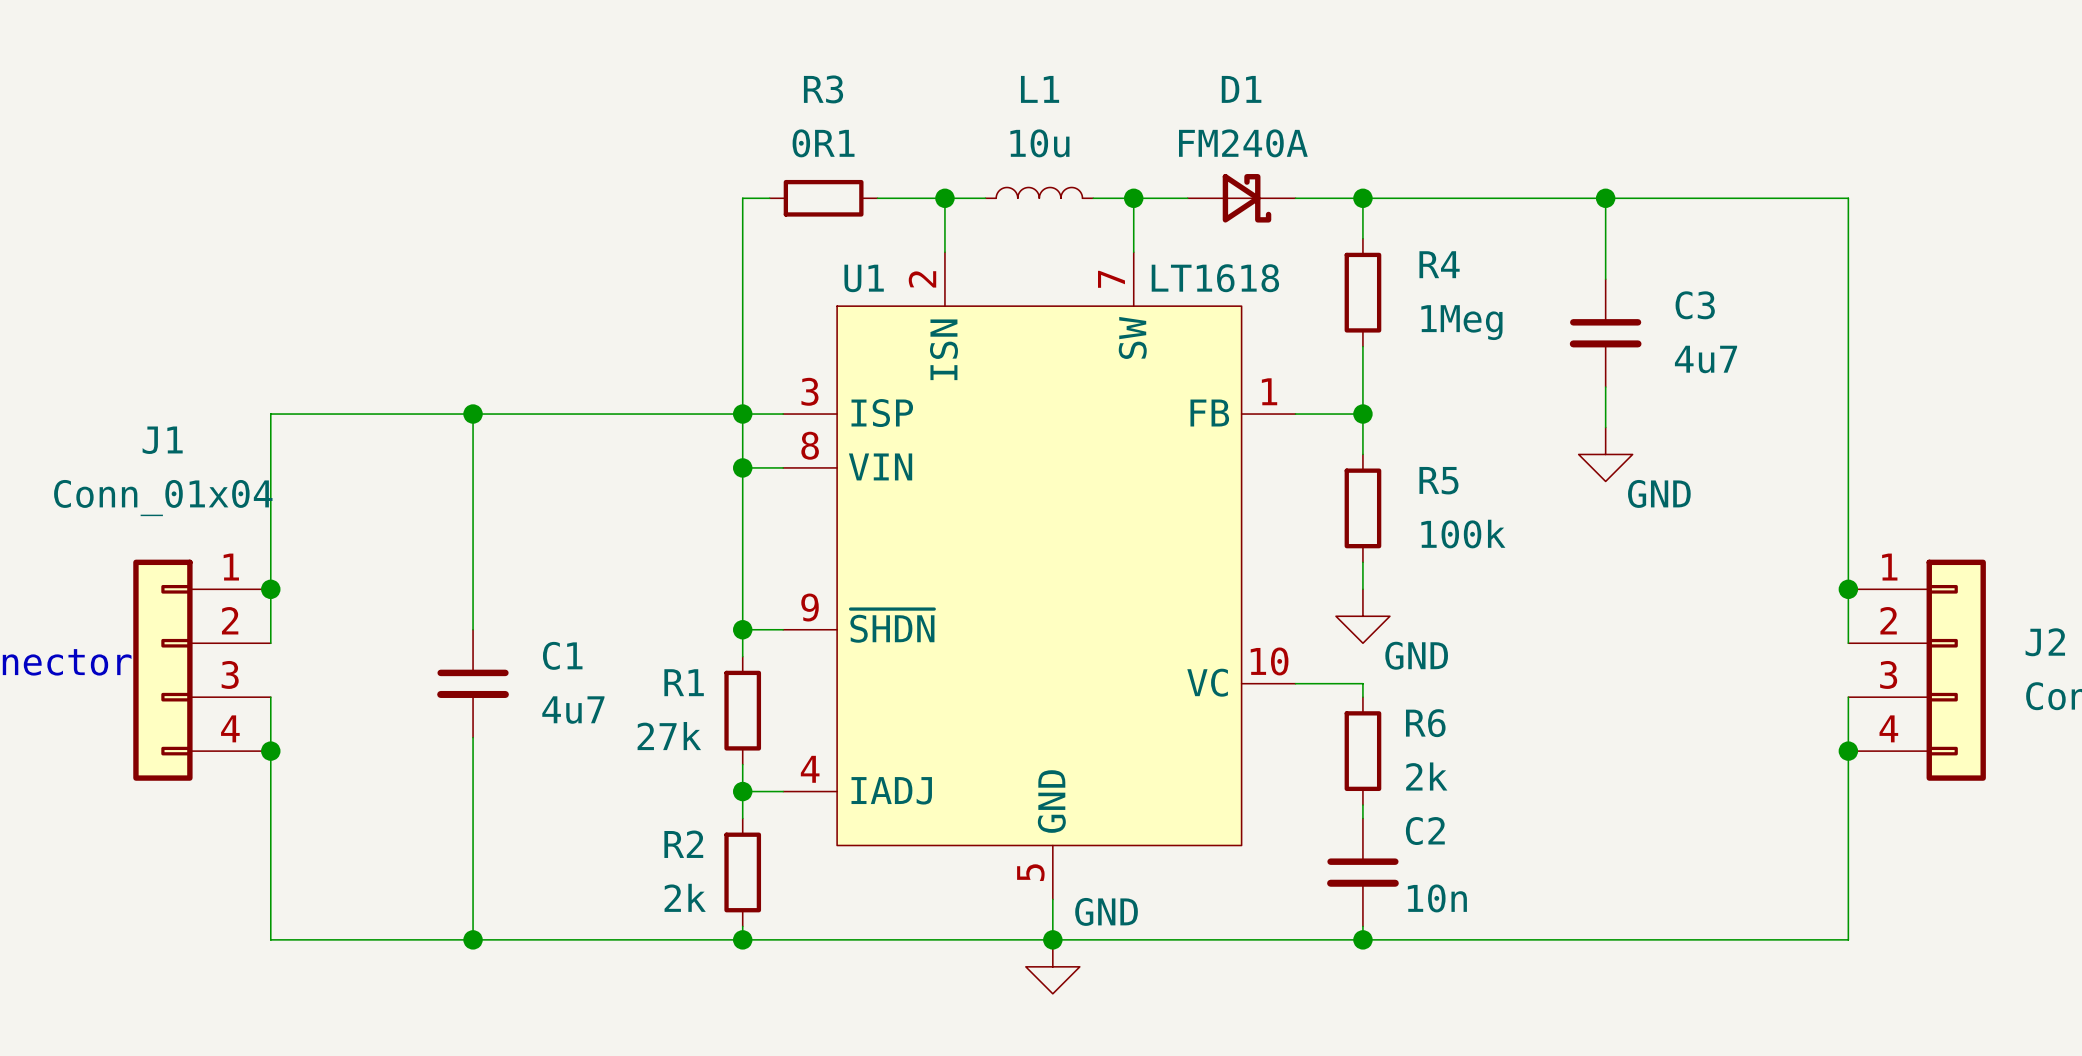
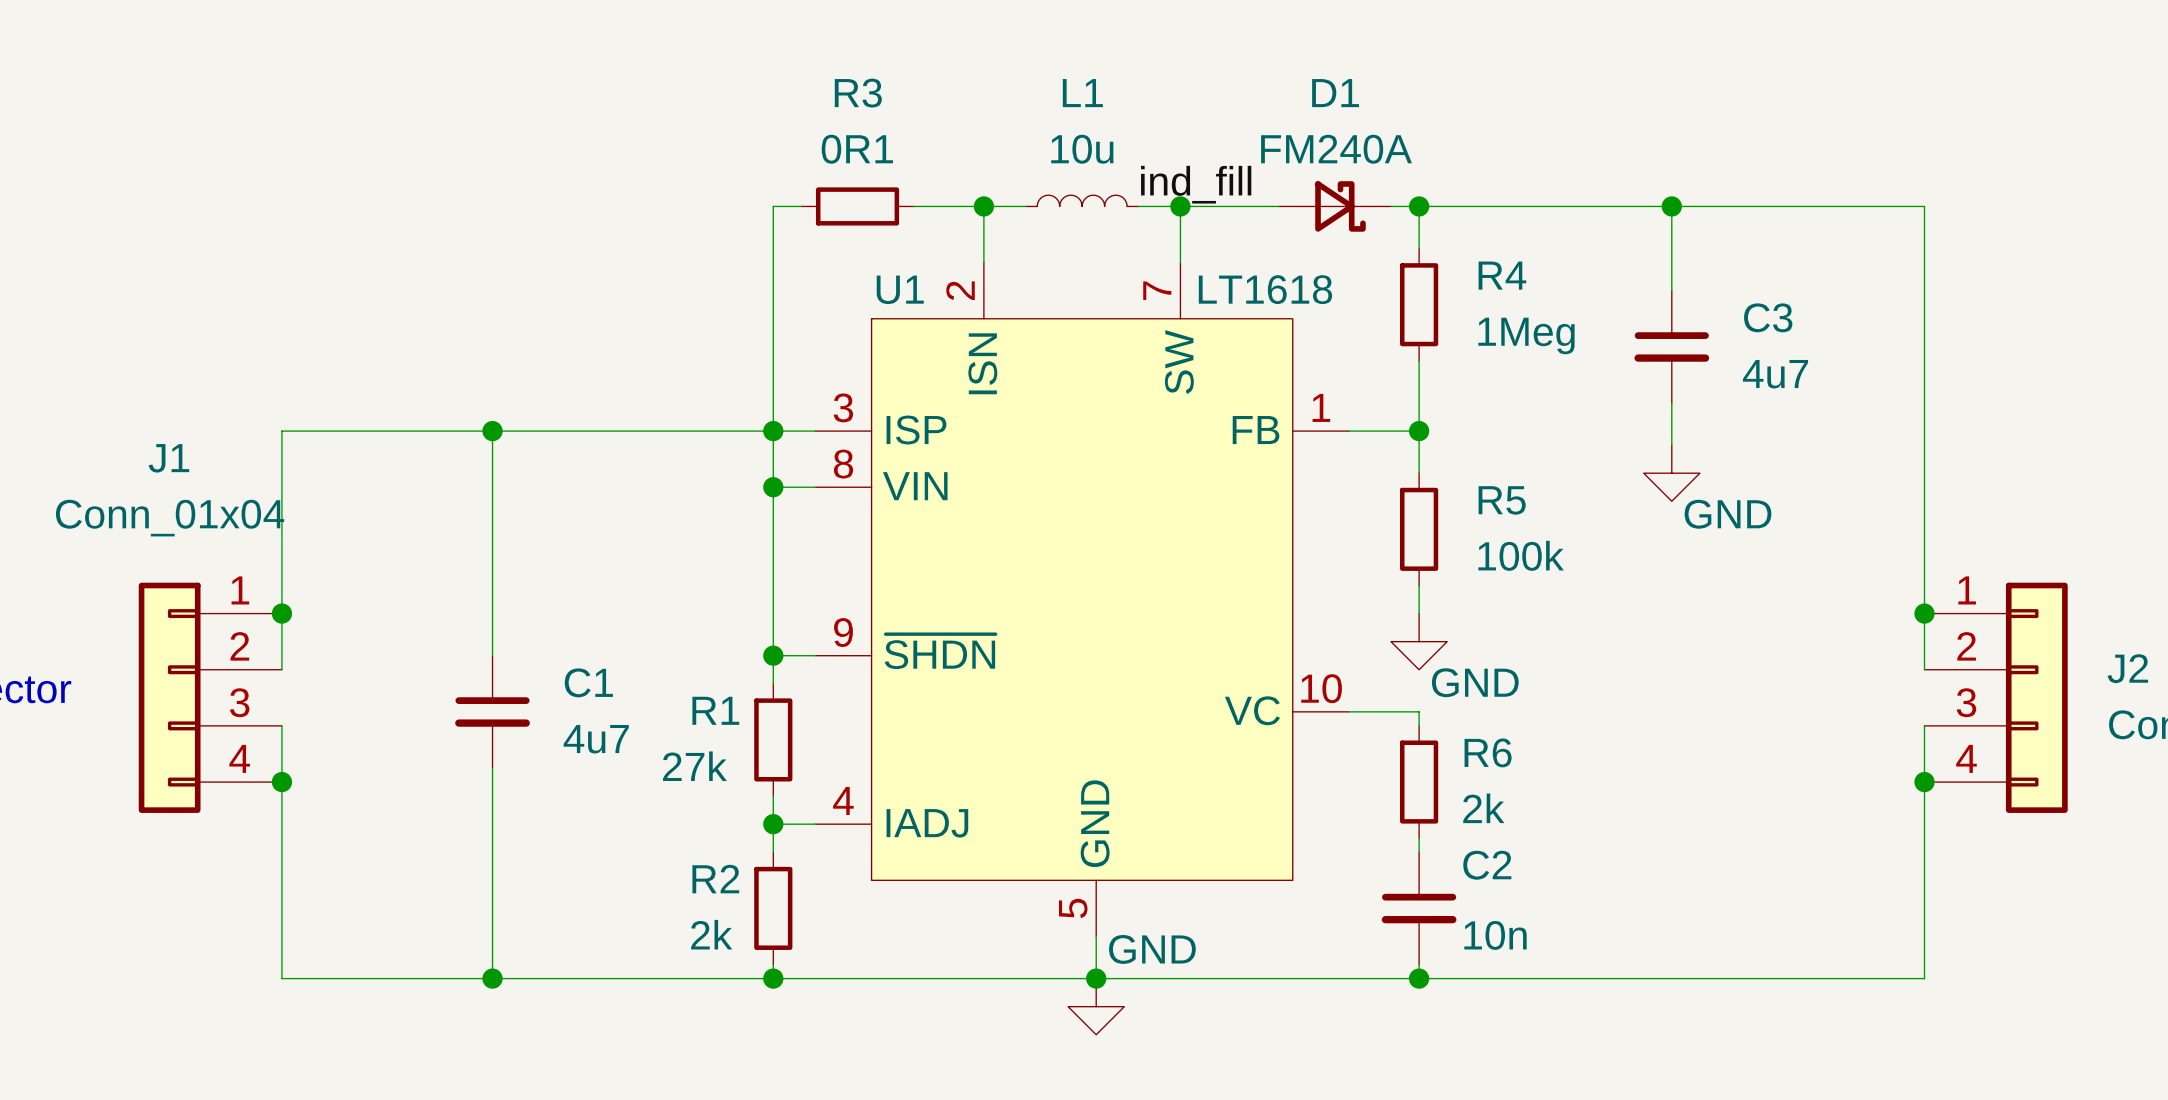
label: none -> ind_fill (1196, 184)
D1 position: (1241, 198) -> (1334, 206)

